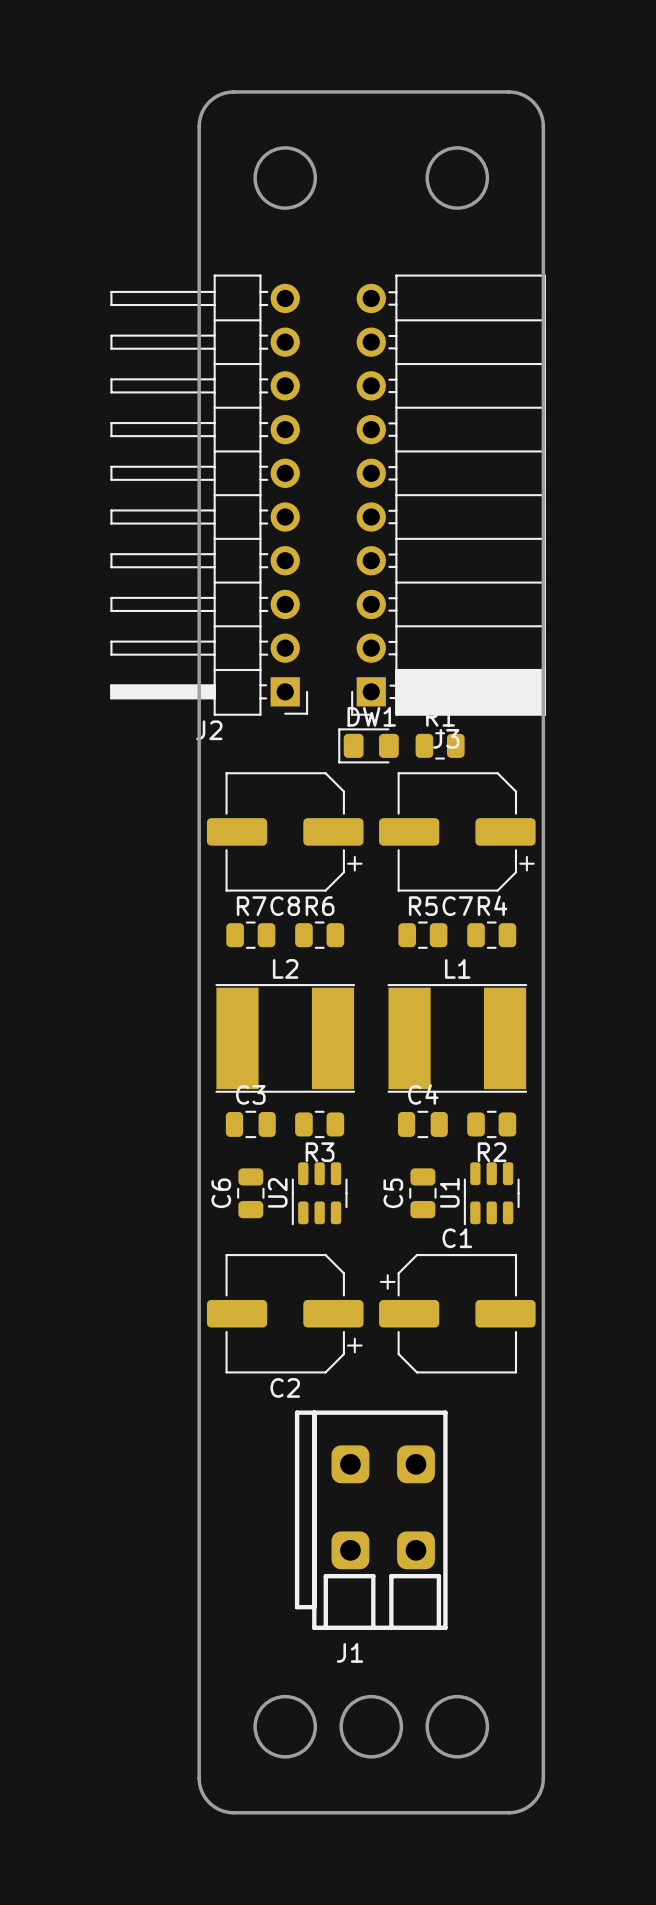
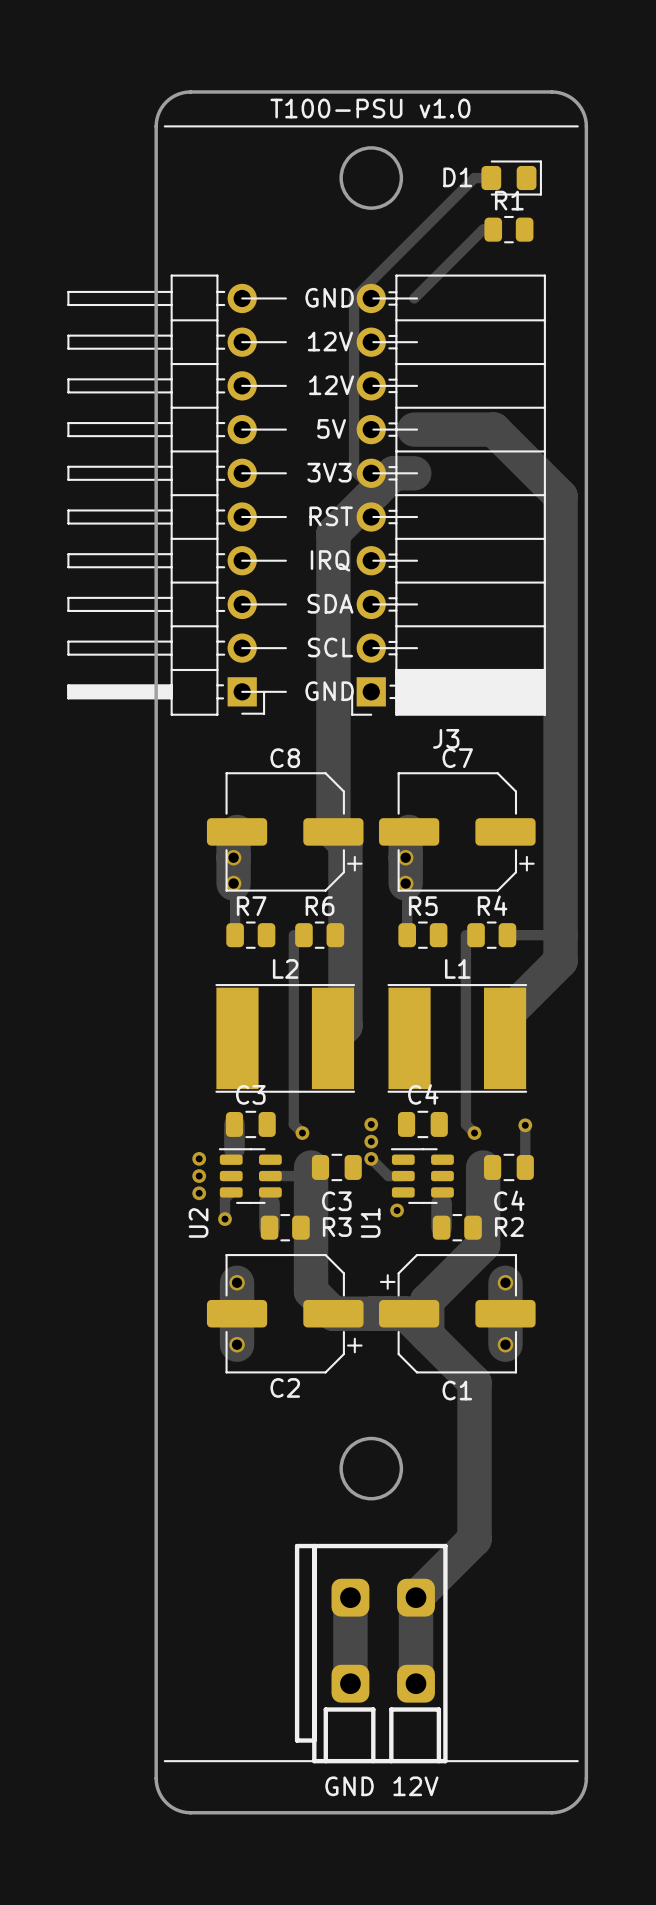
board edge: (233, 91) (222, 93) (209, 102) (201, 115) (199, 126) (199, 1778) (201, 1789) (209, 1802) (222, 1810) (233, 1812) -> (233, 91) (186, 92) (175, 95) (161, 108) (156, 126) (156, 1778) (161, 1796) (175, 1809) (186, 1812) (233, 1812)
board edge: (508, 91) (523, 95) (533, 102) (539, 111) (543, 126) (543, 1778) (539, 1793) (533, 1802) (523, 1809) (508, 1812) -> (508, 91) (555, 92) (566, 95) (581, 108) (586, 126) (586, 1778) (581, 1796) (566, 1809) (555, 1812) (508, 1812)
text: none -> T100-PSU v1.0 (370, 108)
line: none -> (164, 126) (577, 126)
round board edge: [253, 146, 318, 210] -> none
round board edge: none -> [339, 146, 404, 210]
round board edge: [425, 146, 490, 210] -> none
track: none -> (491, 178) (474, 178) (354, 298) (354, 470) (375, 491)
D1: none -> (511, 178)
track: none -> (493, 229) (483, 229) (414, 298)
text: none -> GND (329, 297)
line: none -> (242, 298) (285, 298)
line: none -> (373, 298) (417, 298)
text: none -> 12V (330, 341)
line: none -> (242, 342) (285, 342)
line: none -> (373, 342) (417, 342)
line: none -> (242, 385) (285, 385)
text: none -> 12V (331, 385)
line: none -> (373, 385) (417, 385)
text: none -> 5V (331, 428)
line: none -> (242, 429) (285, 429)
line: none -> (373, 429) (417, 429)
track: none -> (414, 429) (493, 429) (560, 496) (560, 960) (505, 1016) (505, 1038)
text: none -> 3V3 (329, 472)
line: none -> (242, 473) (285, 473)
line: none -> (373, 473) (417, 473)
track: none -> (414, 473) (393, 473) (333, 533) (333, 831) (345, 843) (345, 1025) (332, 1038)
part: none -> (166, 495)
J2: (209, 495) -> none
text: none -> RST (331, 516)
line: none -> (242, 517) (285, 517)
line: none -> (373, 517) (417, 517)
line: none -> (242, 560) (285, 560)
text: none -> IRQ (330, 560)
line: none -> (373, 560) (417, 560)
text: none -> SDA (330, 603)
line: none -> (242, 604) (285, 604)
line: none -> (373, 604) (417, 604)
text: none -> SCL (330, 647)
line: none -> (242, 648) (285, 648)
line: none -> (373, 648) (417, 648)
line: none -> (242, 691) (285, 691)
text: none -> GND (329, 691)
DW1: (368, 745) -> none
R1 position: (440, 745) -> (508, 229)
track: none -> (237, 831) (233, 835) (235, 935)
track: none -> (409, 831) (405, 835) (407, 935)
via: none -> (233, 857)
via: none -> (405, 857)
via: none -> (233, 883)
via: none -> (405, 883)
C8 name position: C8 (285, 906) -> C8 (285, 758)
C7 name position: C7 (457, 906) -> C7 (457, 758)
track: none -> (293, 935) (293, 1124) (302, 1133)
track: none -> (465, 935) (465, 1124) (474, 1133)
track: none -> (507, 935) (560, 935)
track: none -> (234, 1124) (234, 1149)
R3 position: (319, 1124) -> (285, 1227)
via: none -> (371, 1124)
R2 position: (491, 1124) -> (457, 1227)
track: none -> (525, 1125) (525, 1167)
via: none -> (525, 1125)
via: none -> (302, 1133)
via: none -> (474, 1133)
via: none -> (371, 1141)
R3 name position: R3 (320, 1152) -> R3 (337, 1227)
R2 name position: R2 (492, 1152) -> R2 (509, 1227)
via: none -> (199, 1158)
track: none -> (371, 1158) (388, 1176) (403, 1176)
via: none -> (371, 1158)
C3: none -> (336, 1167)
track: none -> (483, 1167) (483, 1244) (427, 1300) (427, 1335)
C4: none -> (508, 1167)
via: none -> (199, 1176)
track: none -> (270, 1176) (302, 1176) (311, 1167) (311, 1291) (333, 1313) (409, 1313)
track: none -> (231, 1192) (225, 1198) (225, 1219)
U2 name position: U2 (277, 1192) -> U2 (198, 1222)
U1 name position: U1 (449, 1192) -> U1 (370, 1222)
via: none -> (199, 1193)
C6: (250, 1193) -> none
U2 rotation: 0° (319, 1193) -> 90° clockwise (250, 1176)
U2 position: (319, 1193) -> (250, 1176)
C5: (422, 1193) -> none
U1 rotation: 0° (491, 1193) -> 90° clockwise (422, 1176)
U1 position: (491, 1193) -> (422, 1176)
track: none -> (269, 1203) (269, 1227)
track: none -> (441, 1203) (441, 1227)
via: none -> (397, 1210)
via: none -> (225, 1219)
C1 name position: C1 (457, 1238) -> C1 (457, 1390)
track: none -> (237, 1282) (237, 1344)
via: none -> (237, 1282)
track: none -> (505, 1282) (505, 1344)
via: none -> (505, 1282)
track: none -> (405, 1313) (474, 1382) (474, 1539) (416, 1597) (416, 1683)
via: none -> (237, 1344)
via: none -> (505, 1344)
round board edge: none -> [339, 1436, 404, 1501]
J1: (371, 1520) -> none
track: none -> (350, 1597) (350, 1683)
part: none -> (371, 1653)
round board edge: [253, 1694, 318, 1759] -> none
round board edge: [339, 1694, 404, 1759] -> none
round board edge: [425, 1694, 490, 1759] -> none
line: none -> (164, 1761) (314, 1761)
line: none -> (445, 1761) (577, 1761)
text: none -> GND (349, 1786)
text: none -> 12V (415, 1786)

